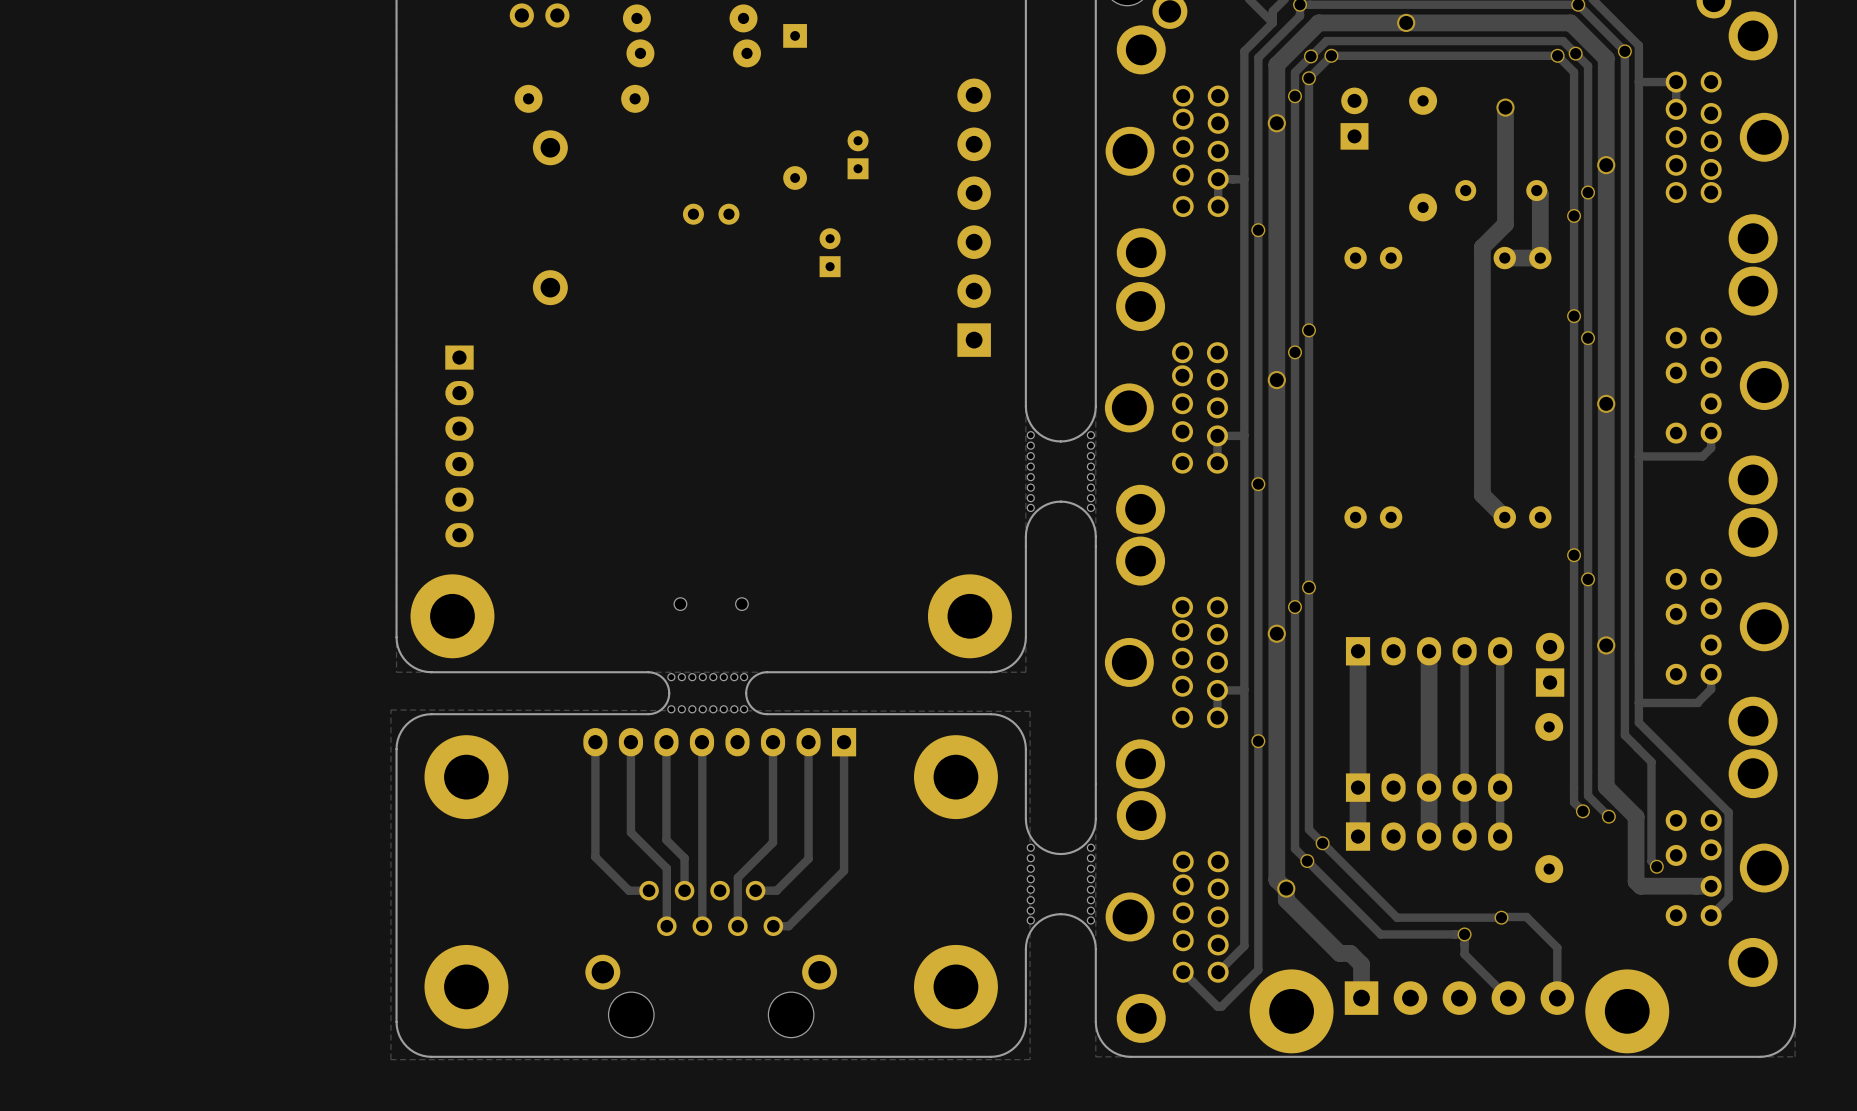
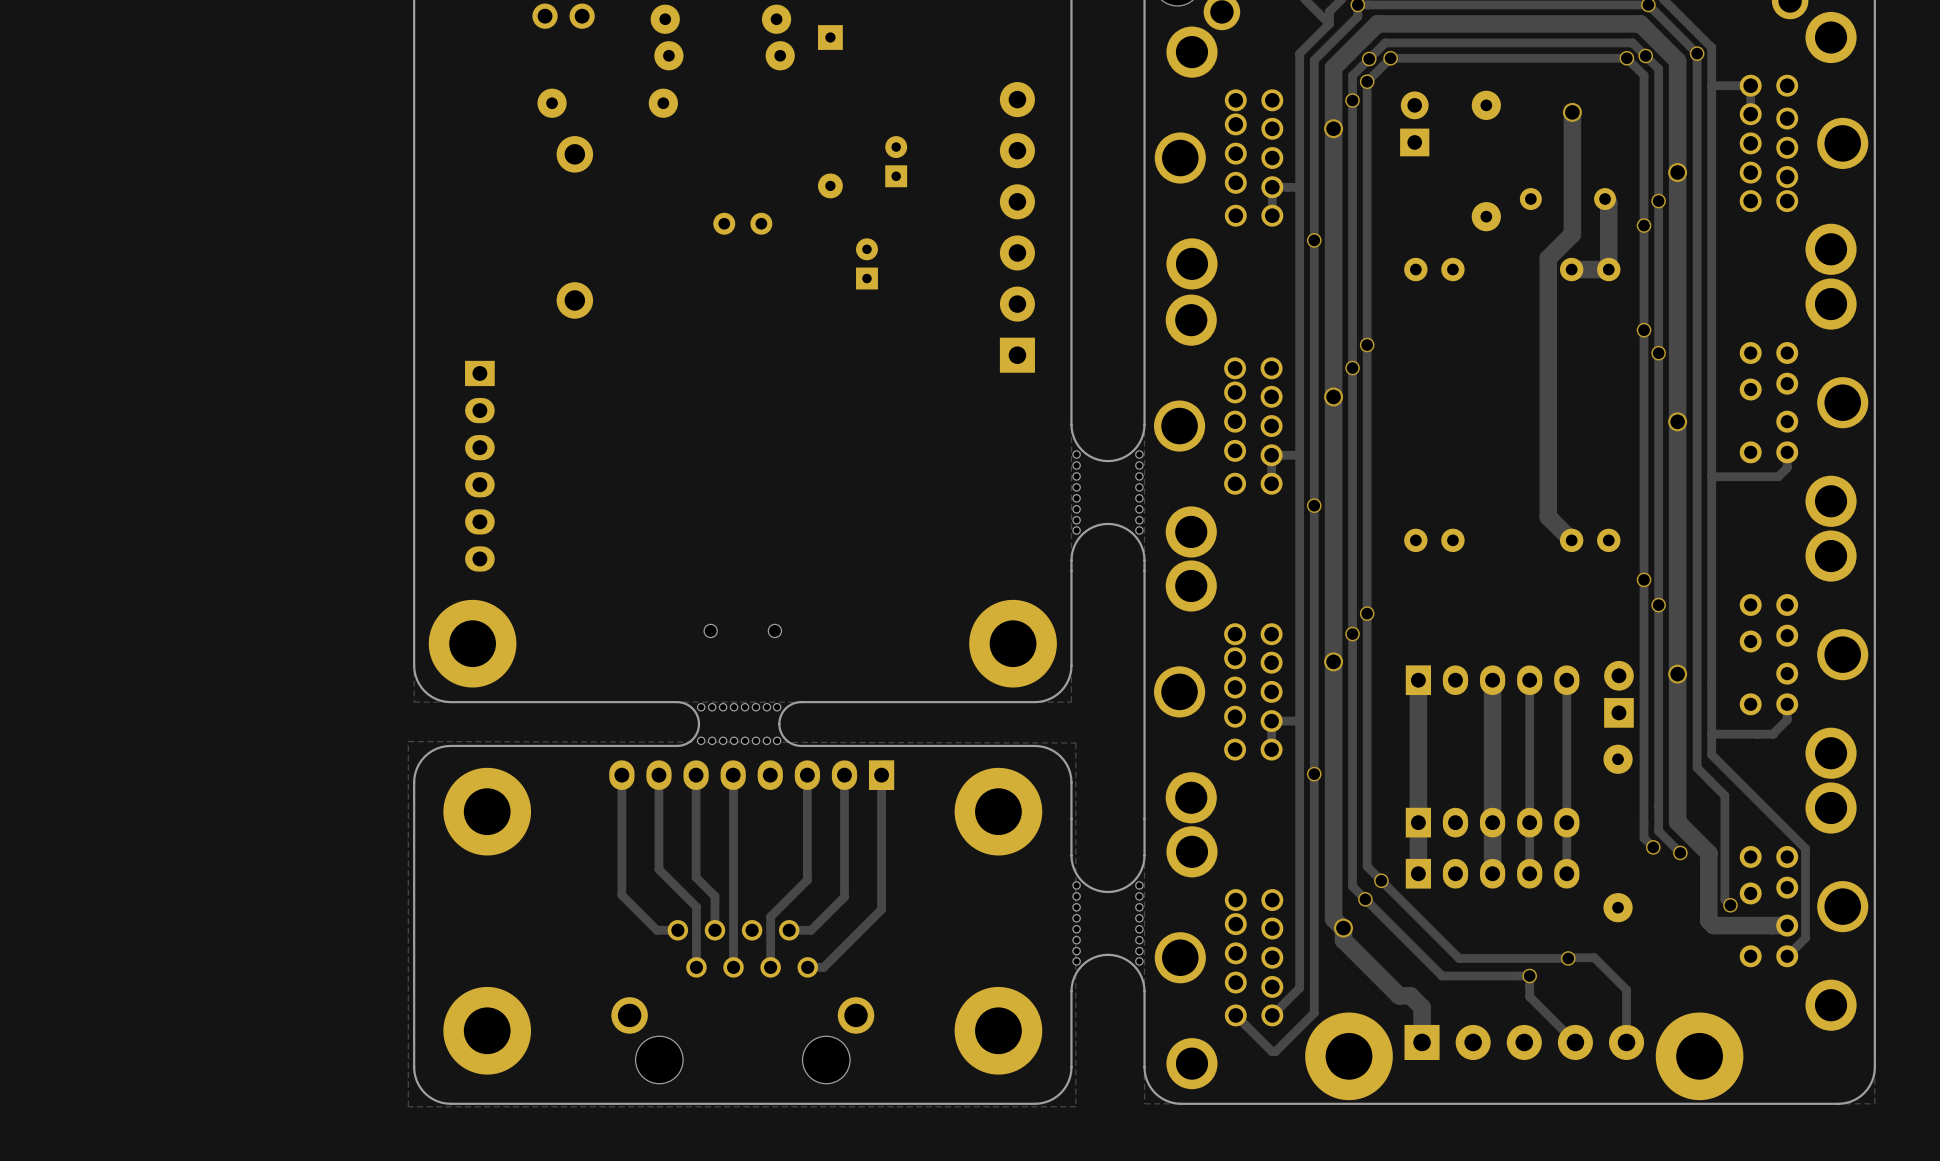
via: (1406, 22) -> none

